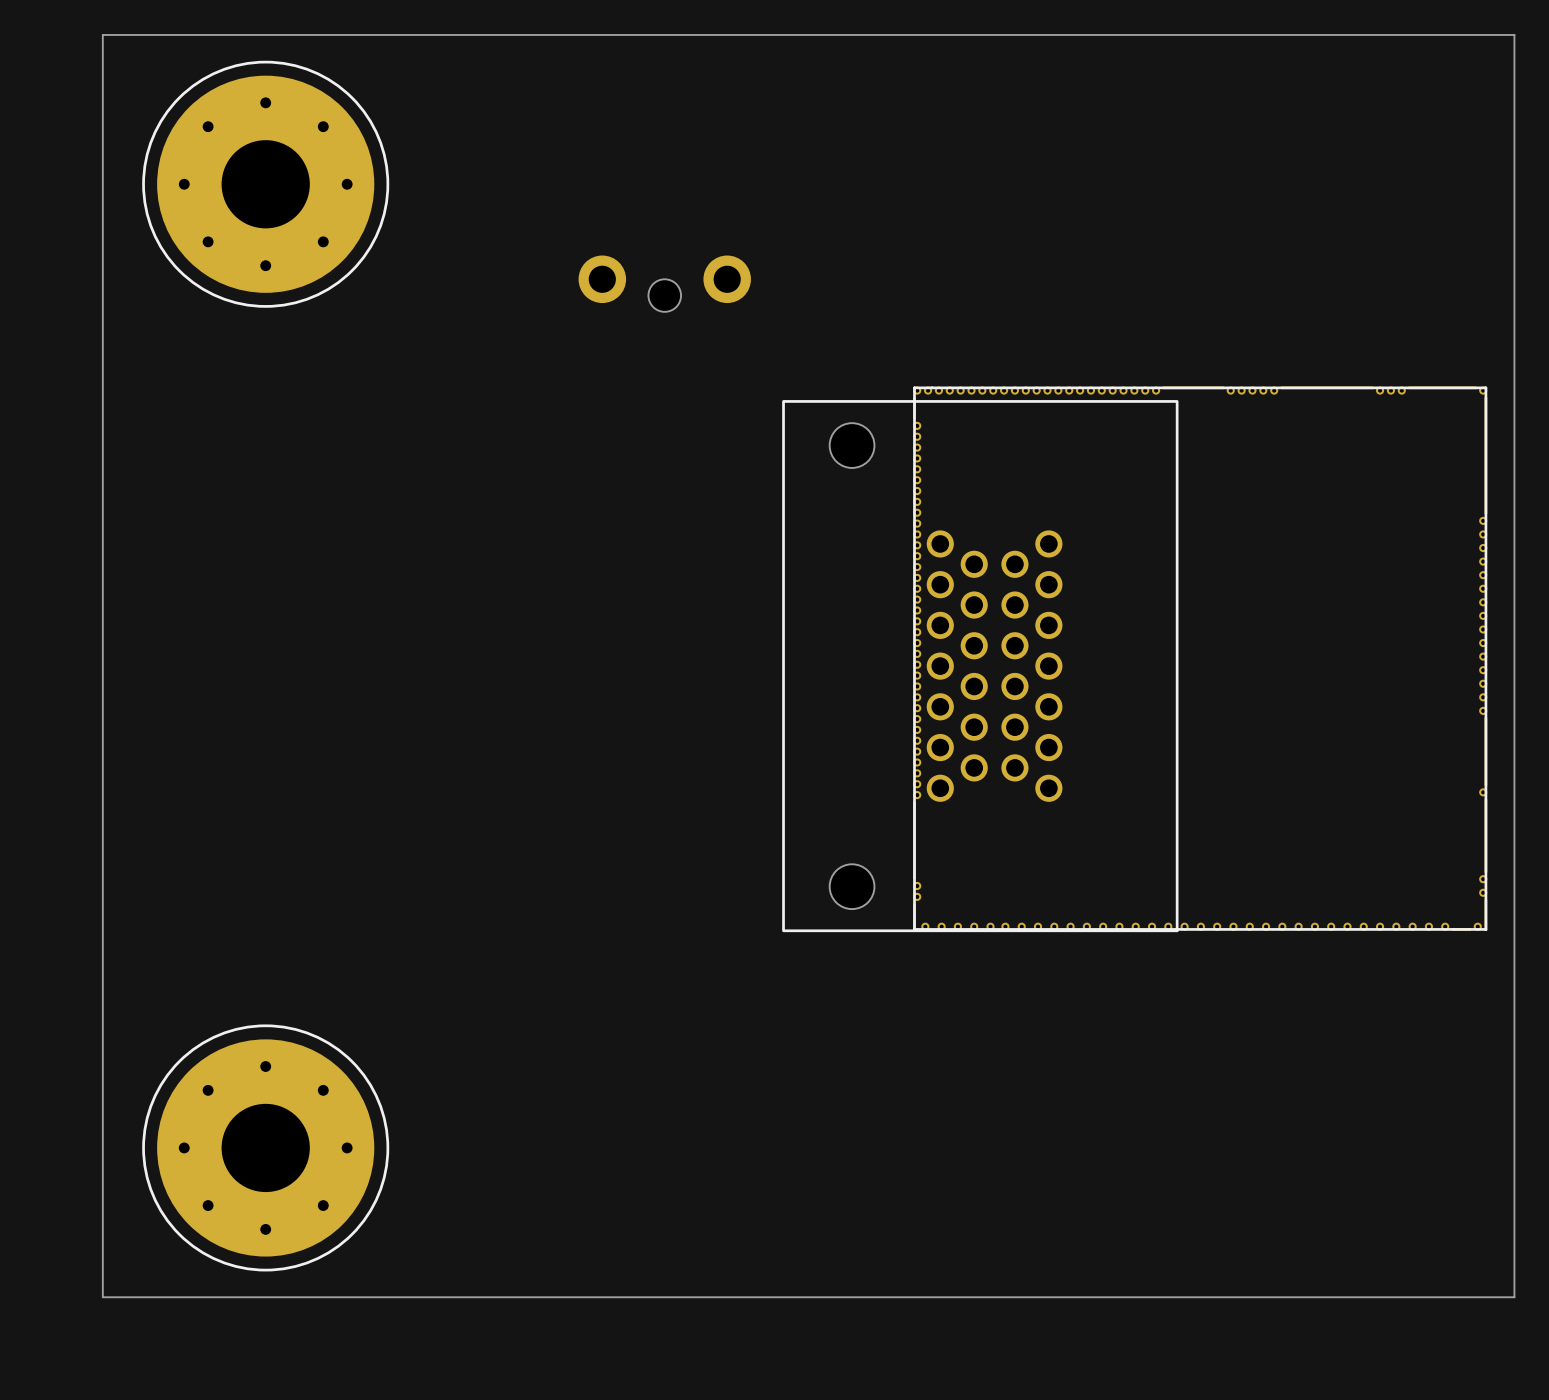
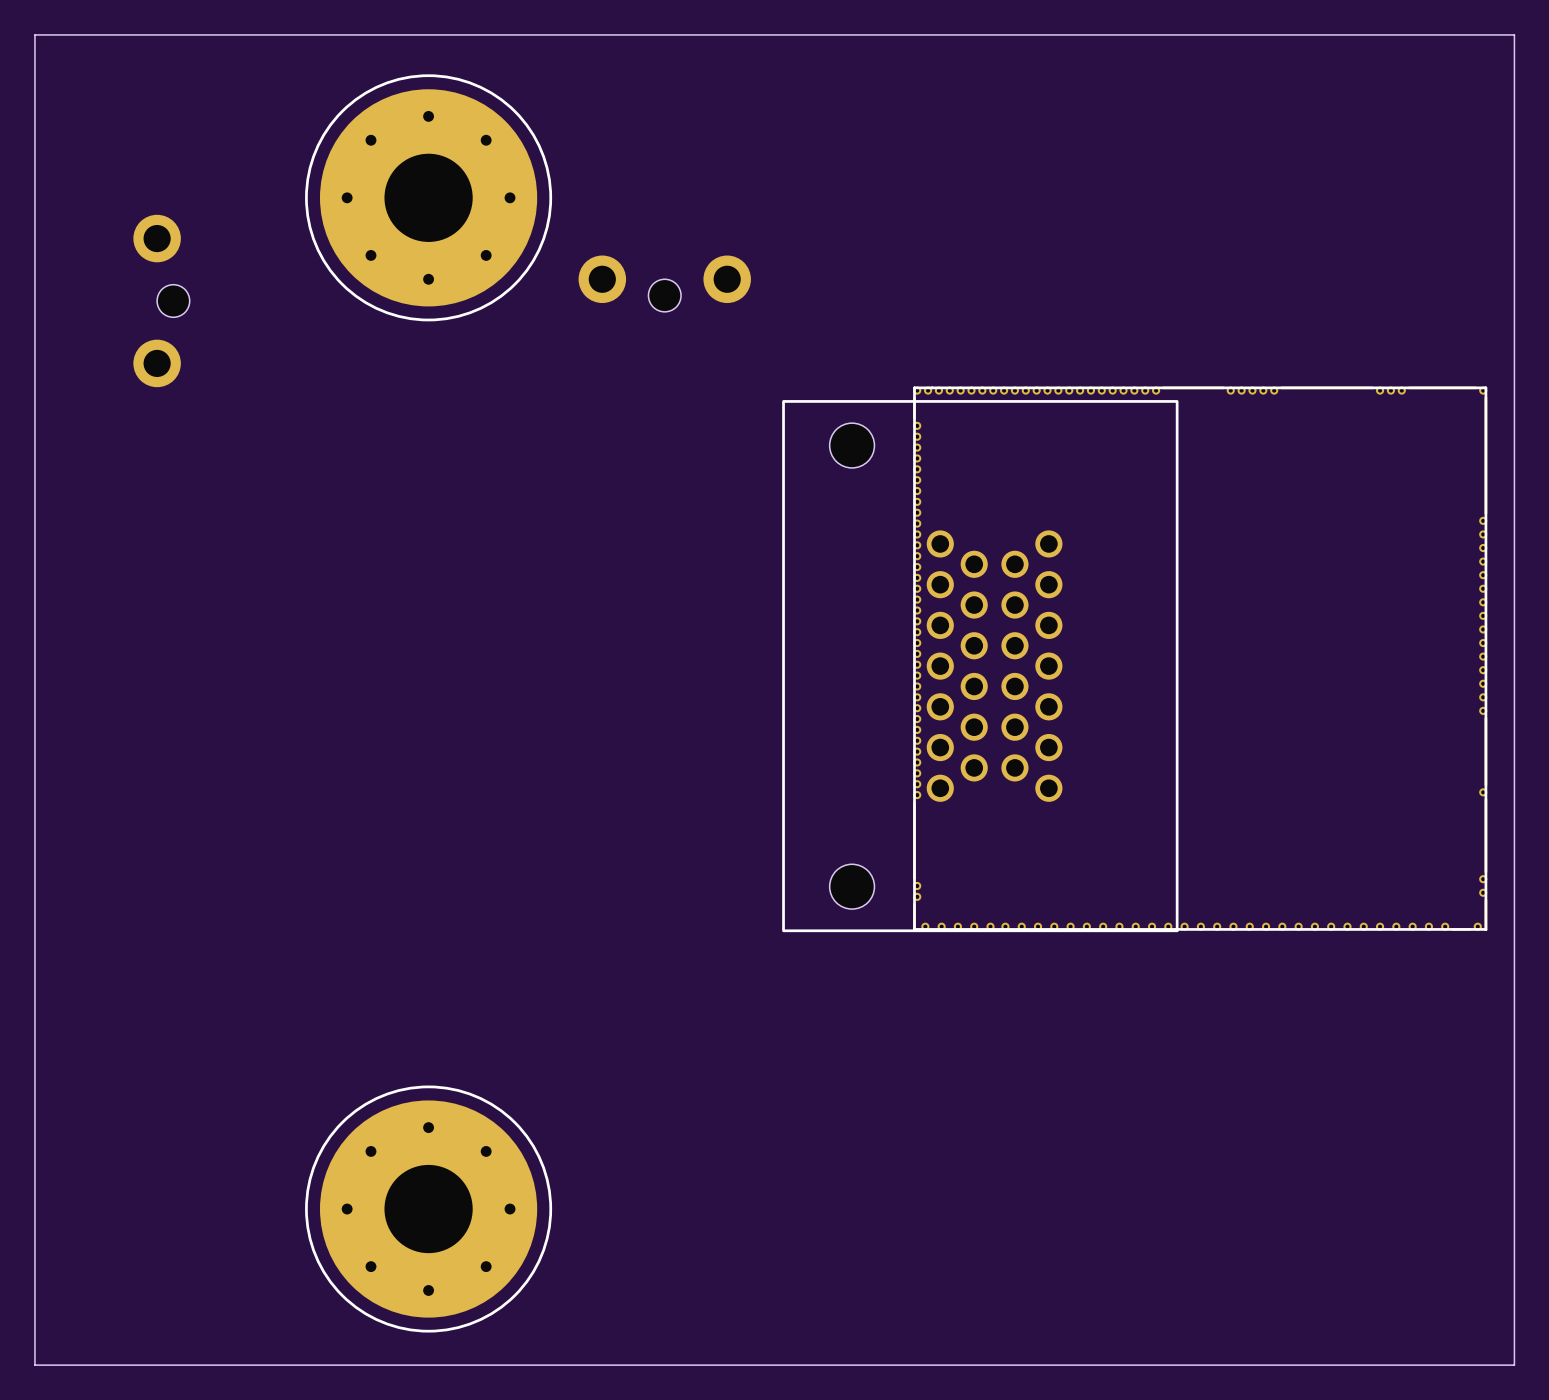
board edge: (102, 34) (102, 1297) (1514, 1297) -> (102, 34) (34, 34) (34, 1365) (1514, 1365) (1514, 1297)
part position: (265, 184) -> (428, 197)
part: none -> (161, 300)
part position: (265, 1147) -> (428, 1209)

